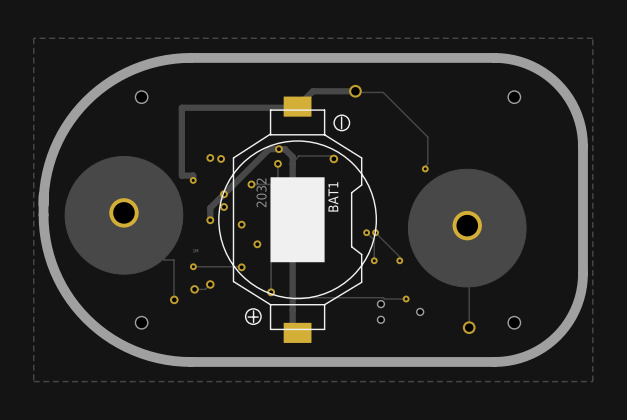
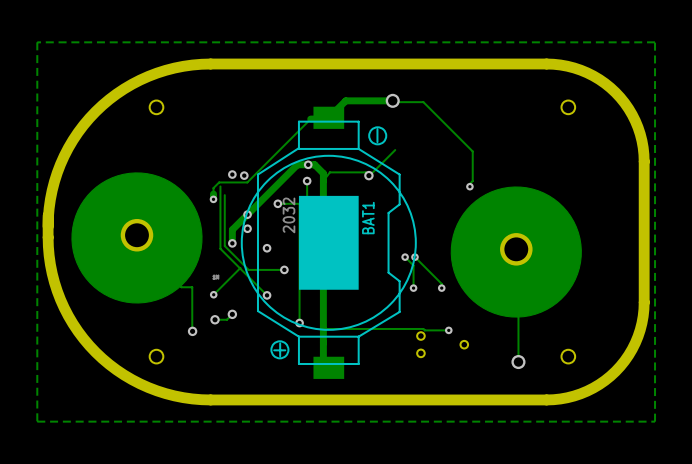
track: (281, 107) (181, 107) (181, 175) (193, 175) -> (310, 119) (247, 182) (219, 182) (213, 188) (213, 194)
track: none -> (395, 150) (369, 175)
track: none -> (220, 186) (220, 248) (267, 295)
track: none -> (224, 195) (224, 246) (248, 269) (284, 269)
track: (193, 266) (241, 267) -> (213, 294) (240, 267)

